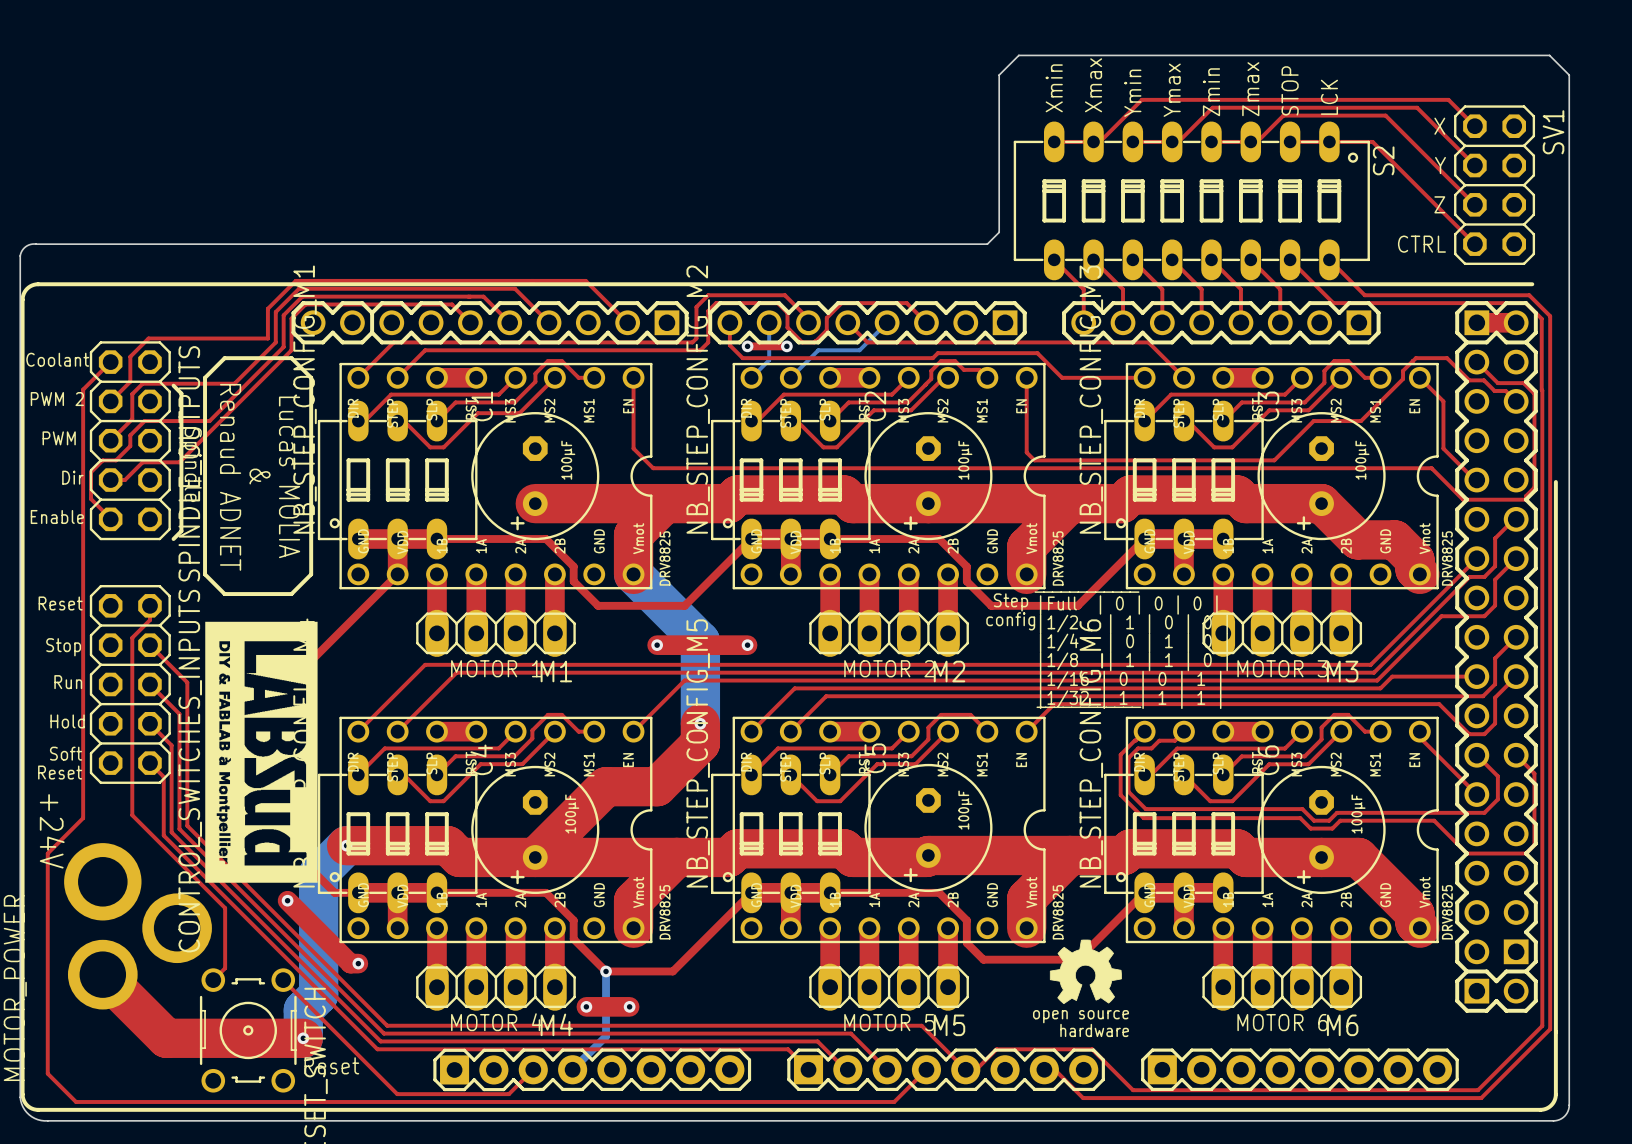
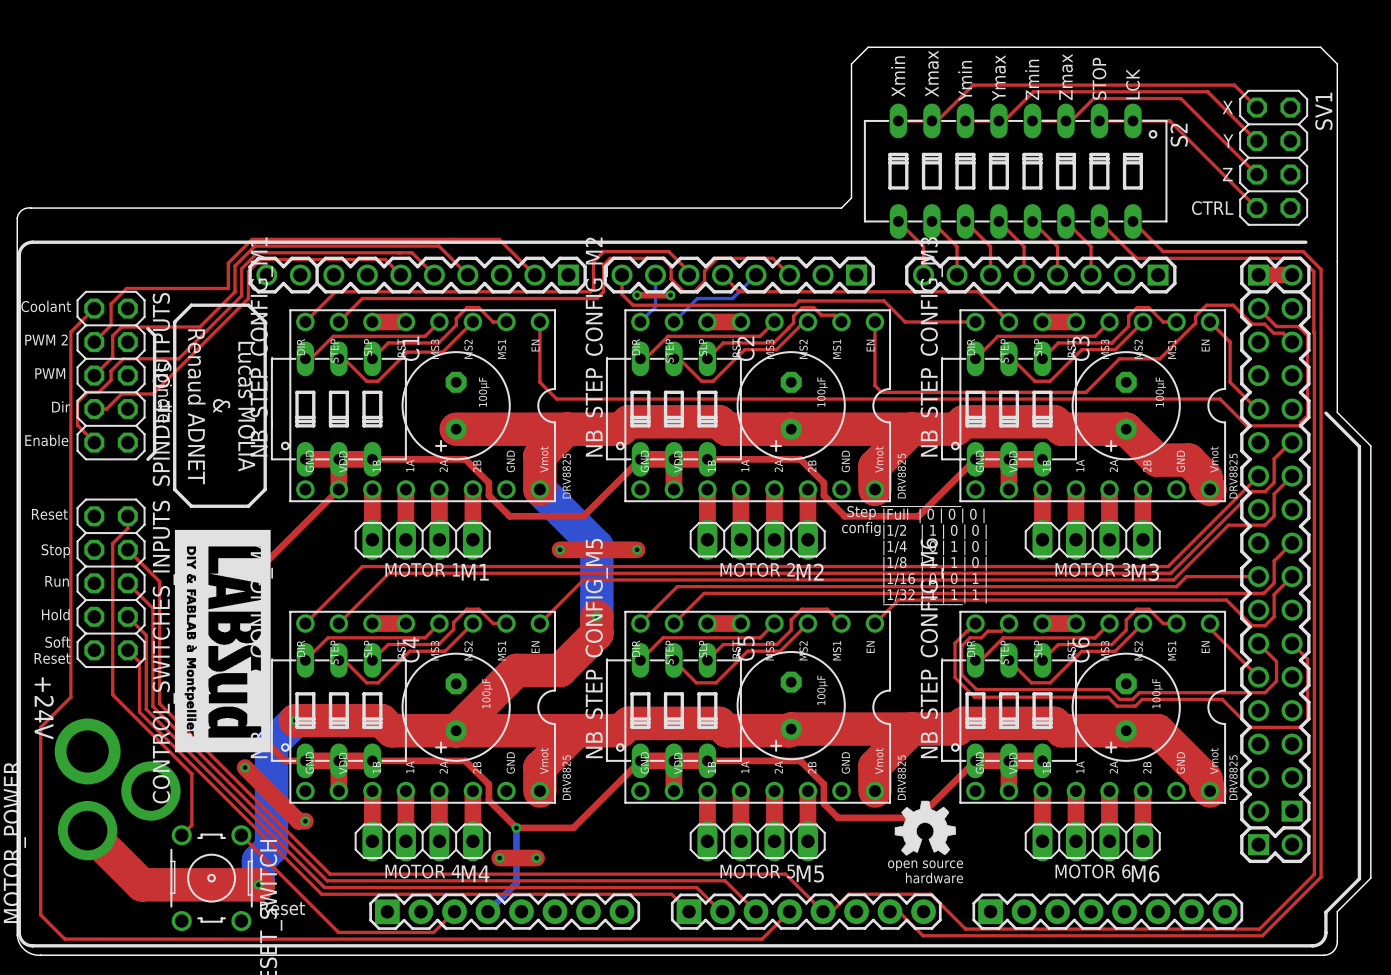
board edge: (1569, 483) (1569, 1069) -> (1337, 412) (1370, 445) (1370, 878) (1337, 911)
part: (789, 697) -> none
part: none -> (689, 594)

